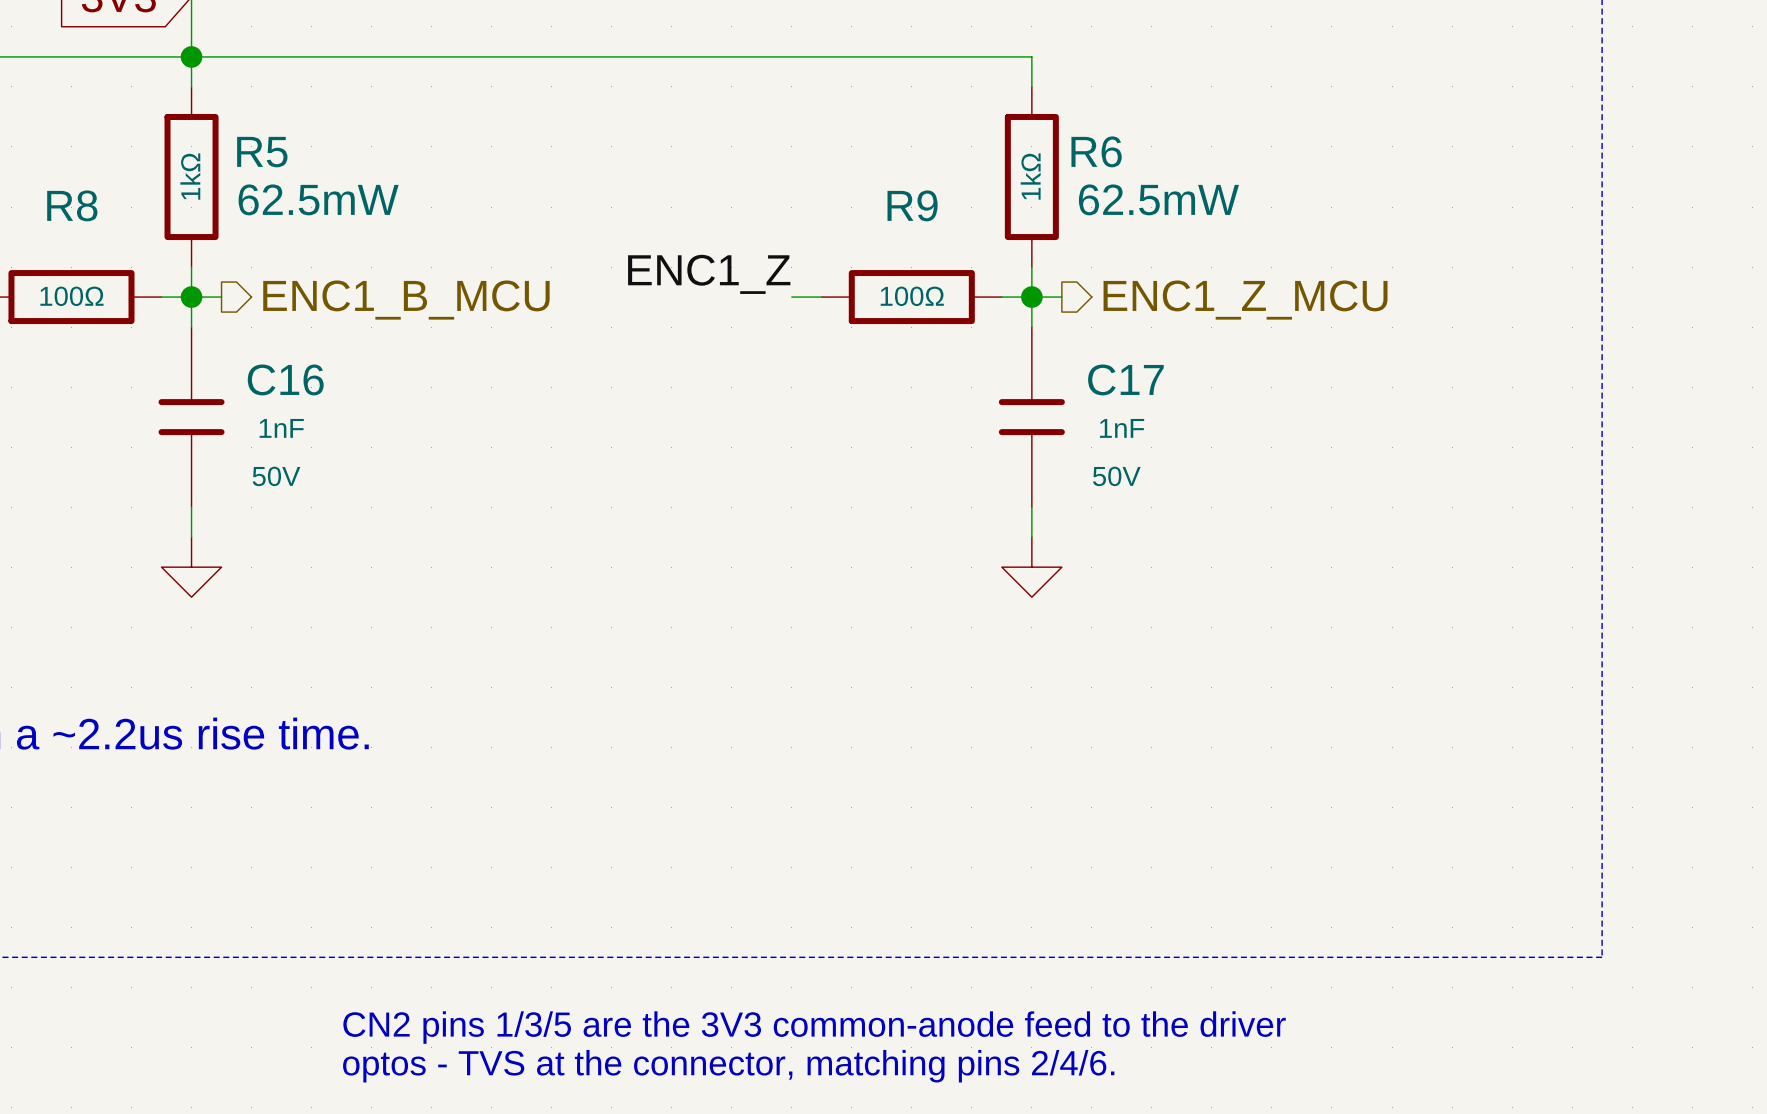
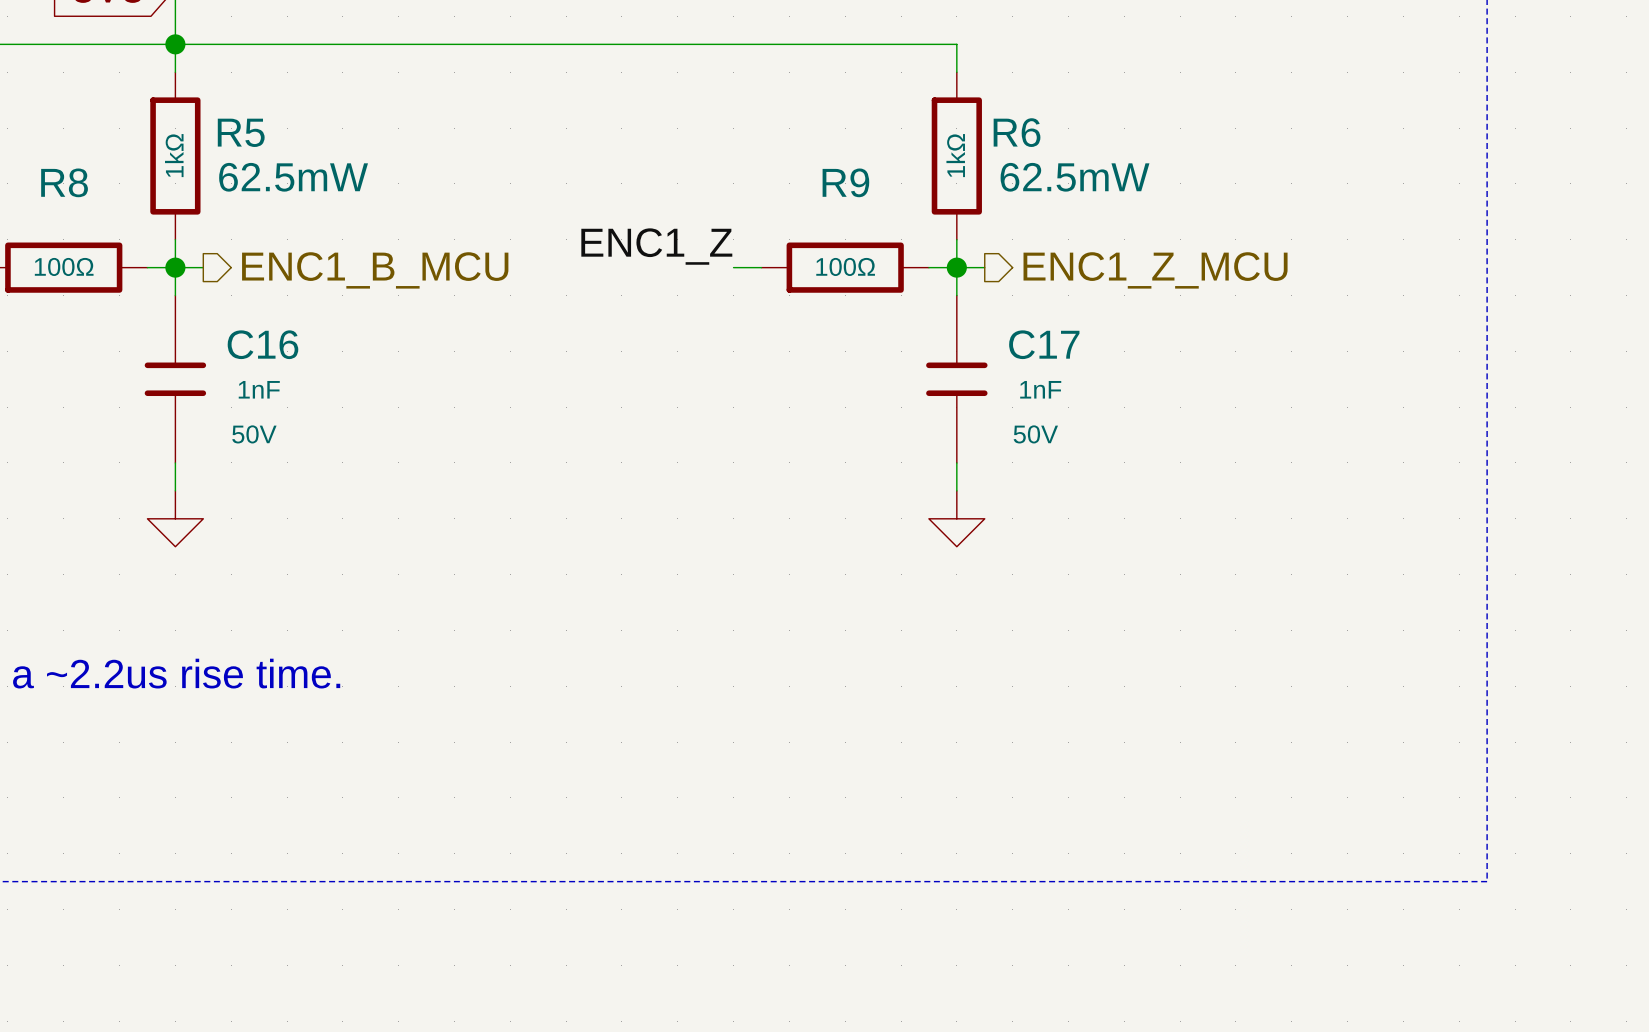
text: CN2 pins 1/3/5 are the 3V3 common-anode feed to the driver (814, 1027) -> none
text: optos - TVS at the connector, matching pins 2/4/6. (728, 1066) -> none

